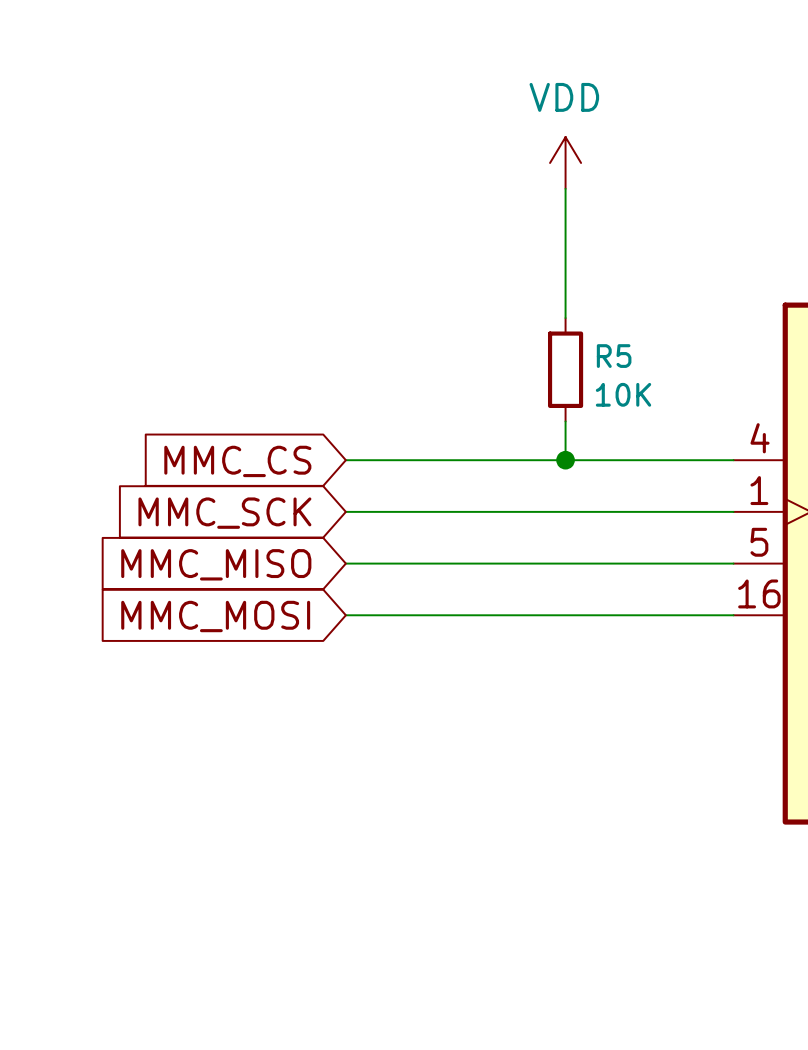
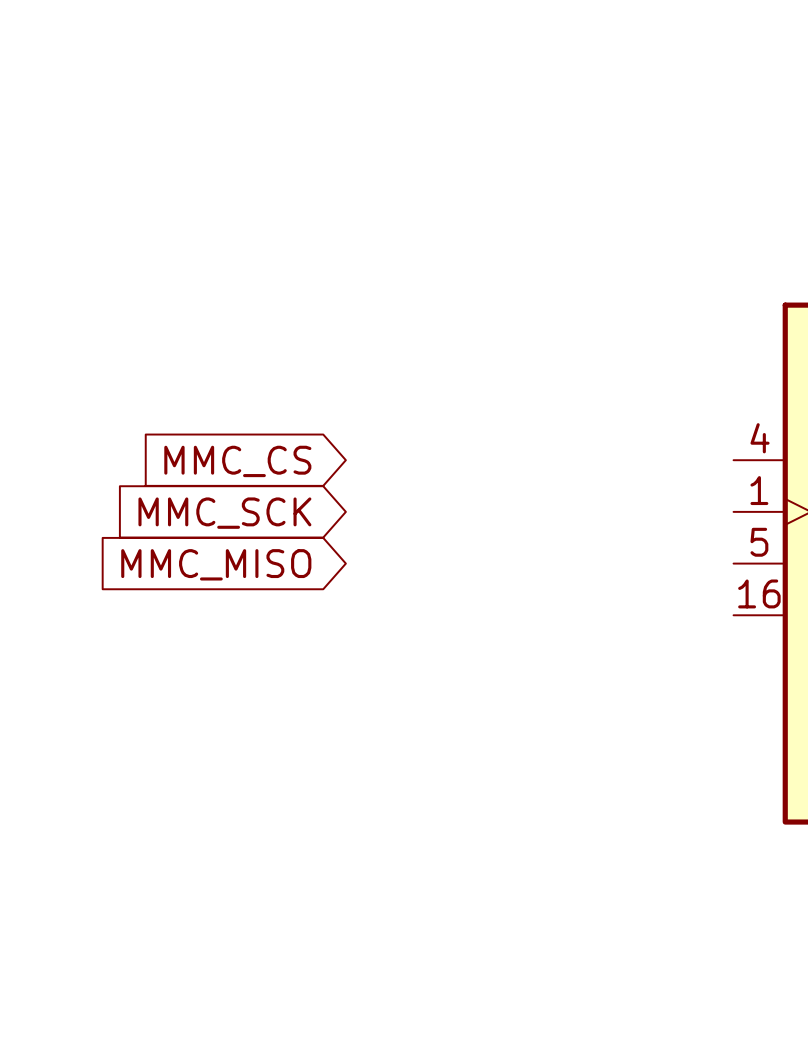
power symbol: VDD (565, 162) -> none
wire: (565, 188) (565, 318) -> none
R5: 10K (565, 369) -> none
wire: (565, 421) (565, 460) -> none
wire: (345, 460) (733, 460) -> none
junction: (565, 460) -> none
wire: (345, 511) (733, 511) -> none
wire: (345, 563) (733, 563) -> none
wire: (345, 615) (733, 615) -> none
global label: MMC_MOSI (215, 616) -> none

